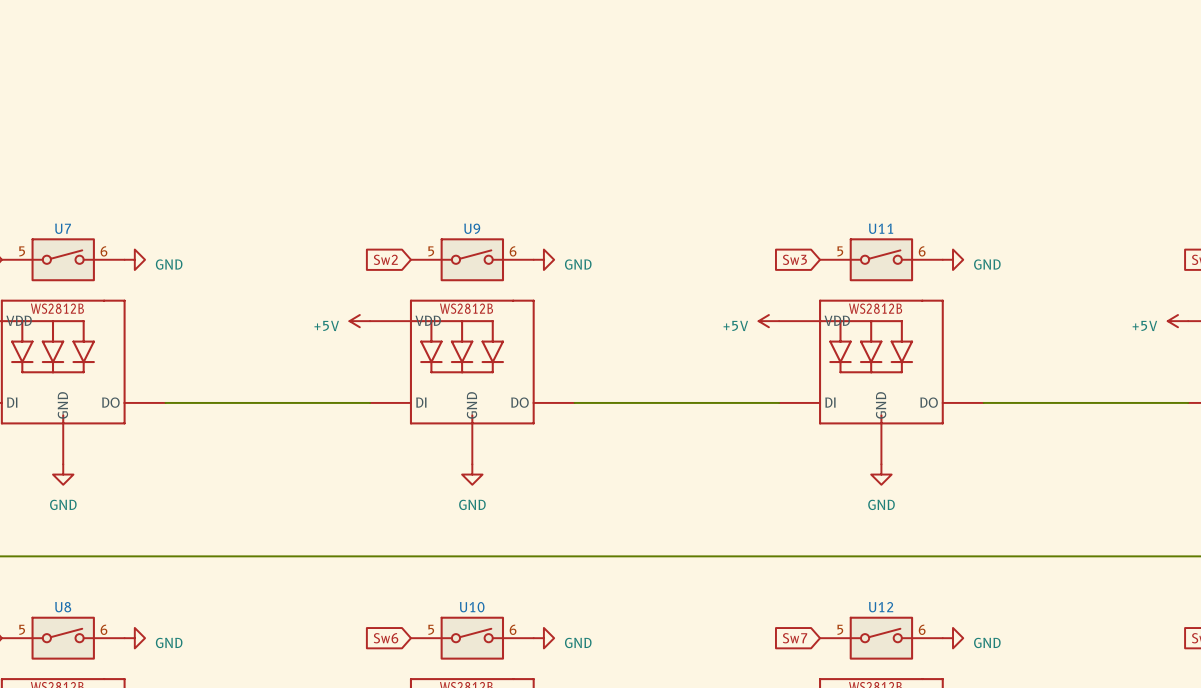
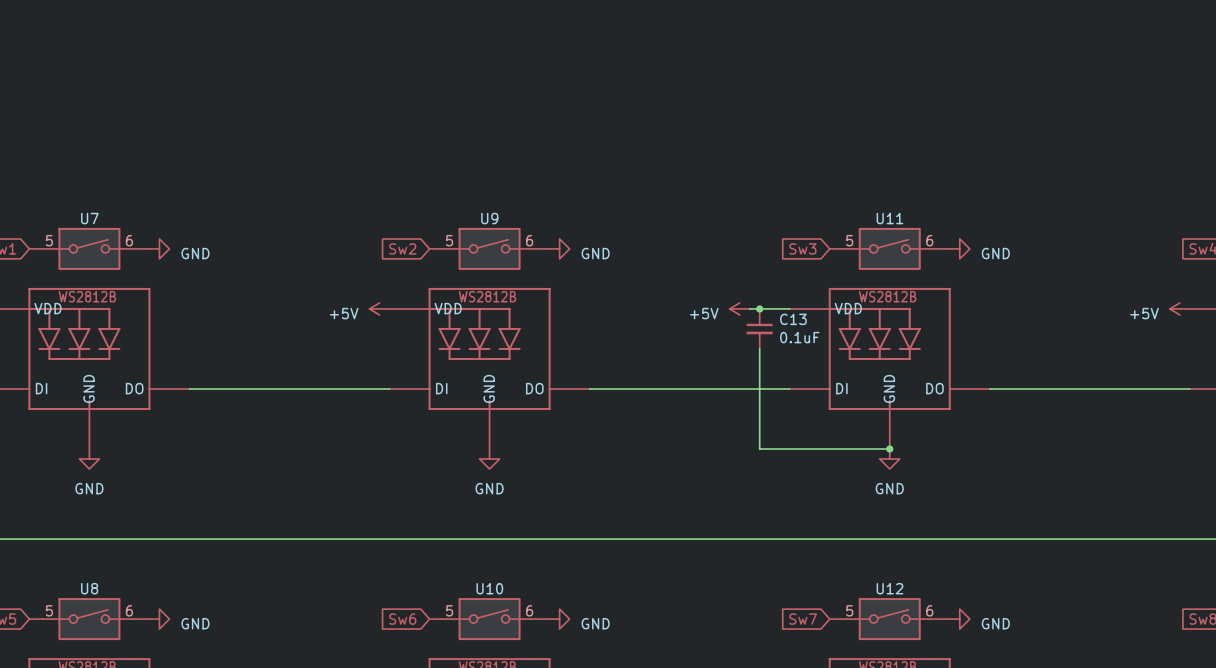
junction: none -> (759, 308)
power symbol position: +5V (768, 321) -> +5V (739, 308)
C13: none -> 0.1uF (759, 328)
wire: none -> (759, 348) (759, 449) (889, 449)
junction: none -> (889, 449)

